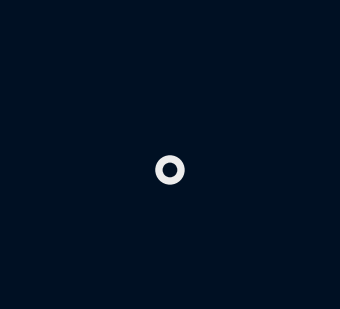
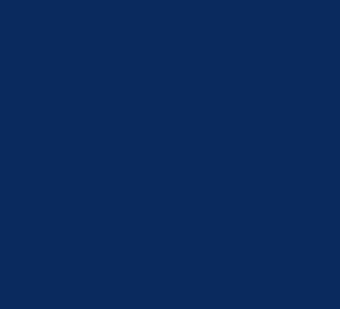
via: (169, 169) -> none

